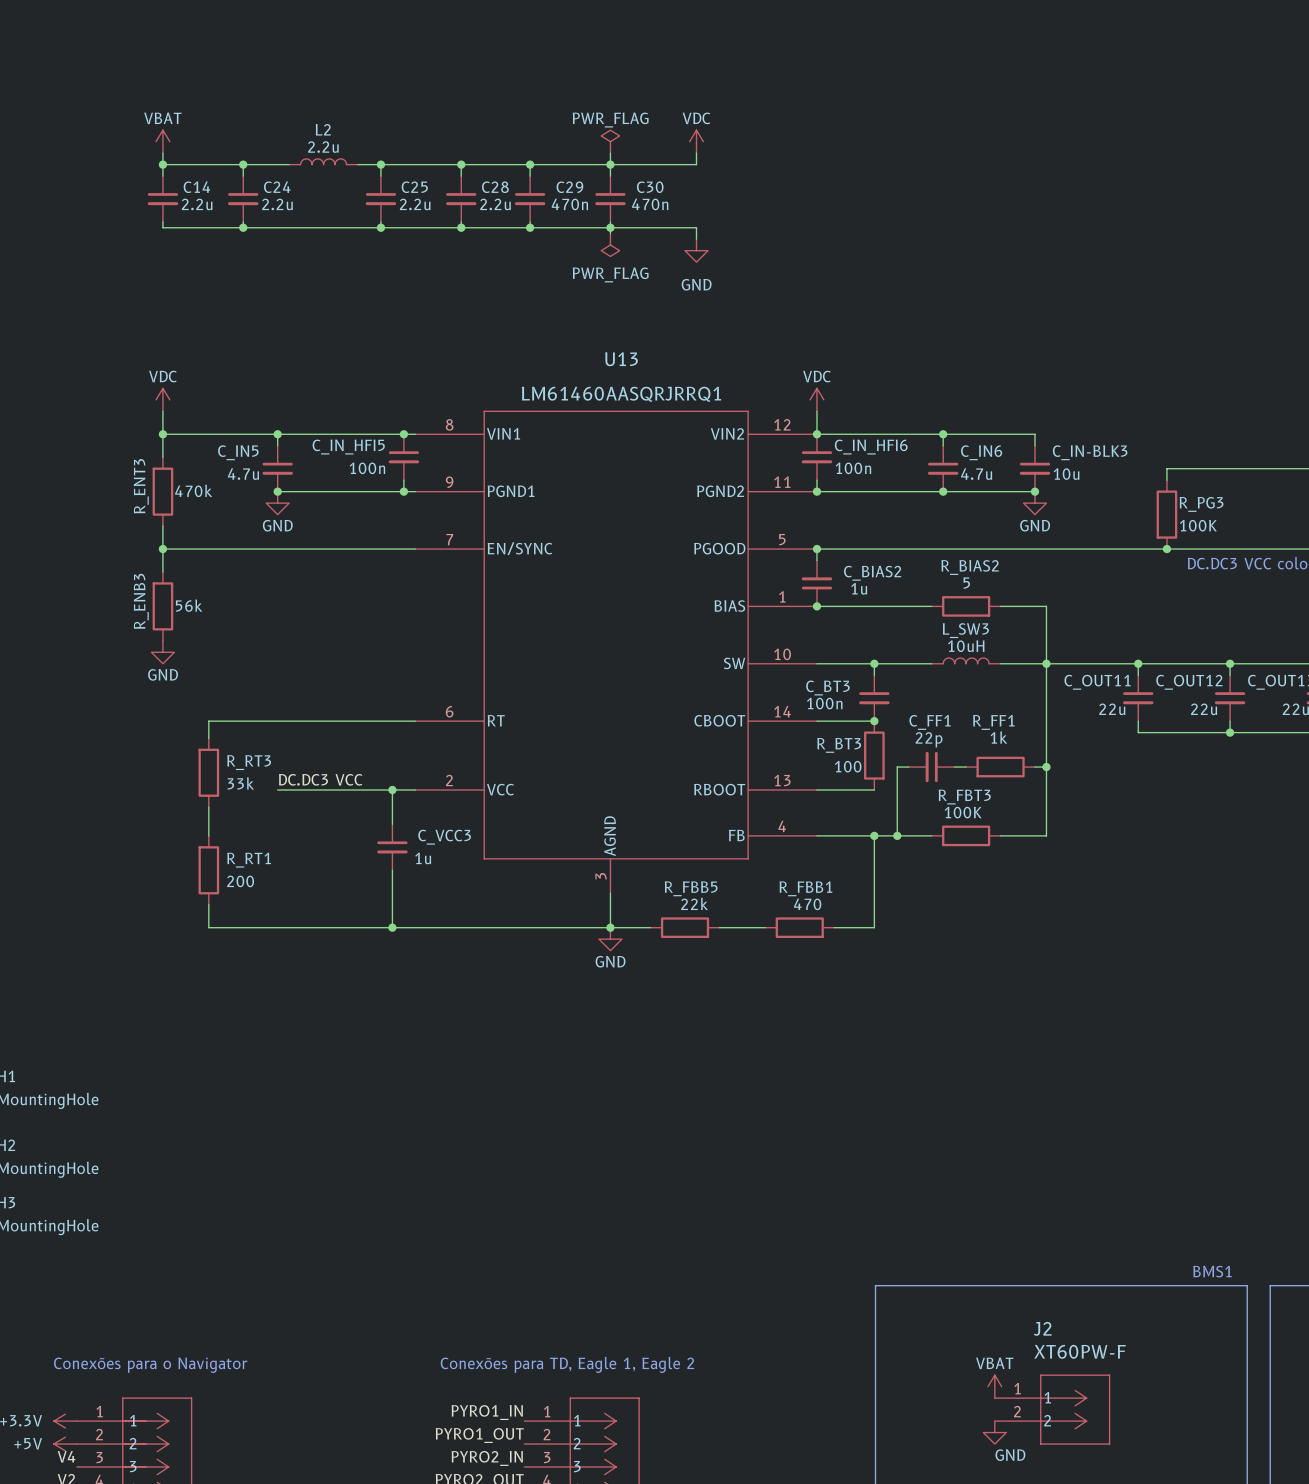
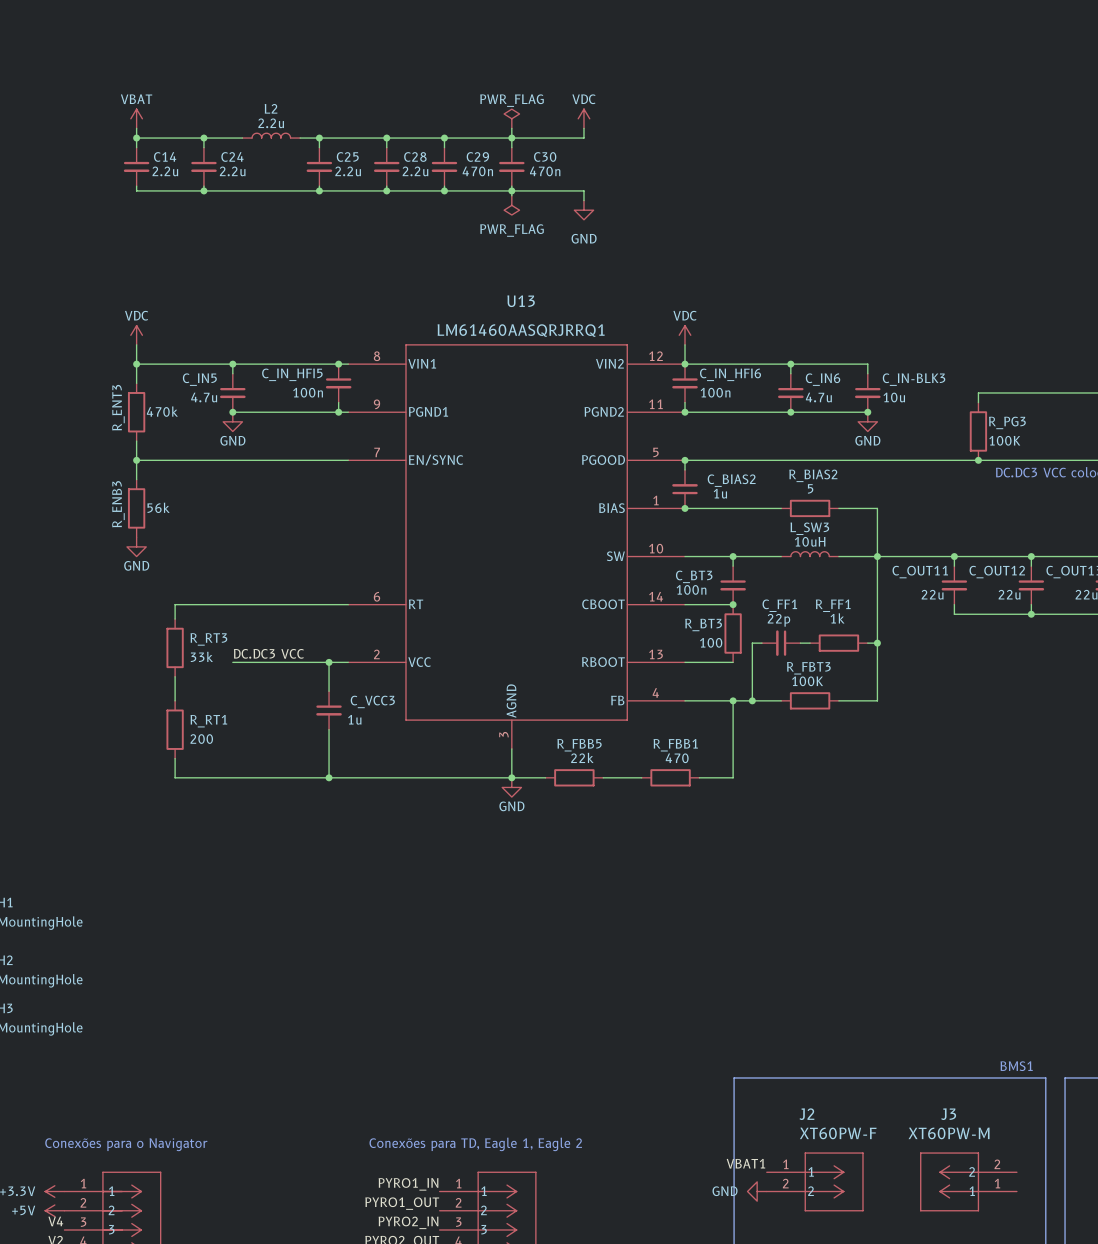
power symbol: VBAT (994, 1386) -> none
label: none -> VBAT1 (745, 1163)
J2 position: (1052, 1409) -> (815, 1181)
J3: none -> XT60PW-M (968, 1181)
power symbol rotation: 0° (994, 1432) -> 90° clockwise (757, 1191)
power symbol position: GND (994, 1432) -> GND (757, 1191)
power symbol text position: GND (1010, 1455) -> GND (725, 1191)

